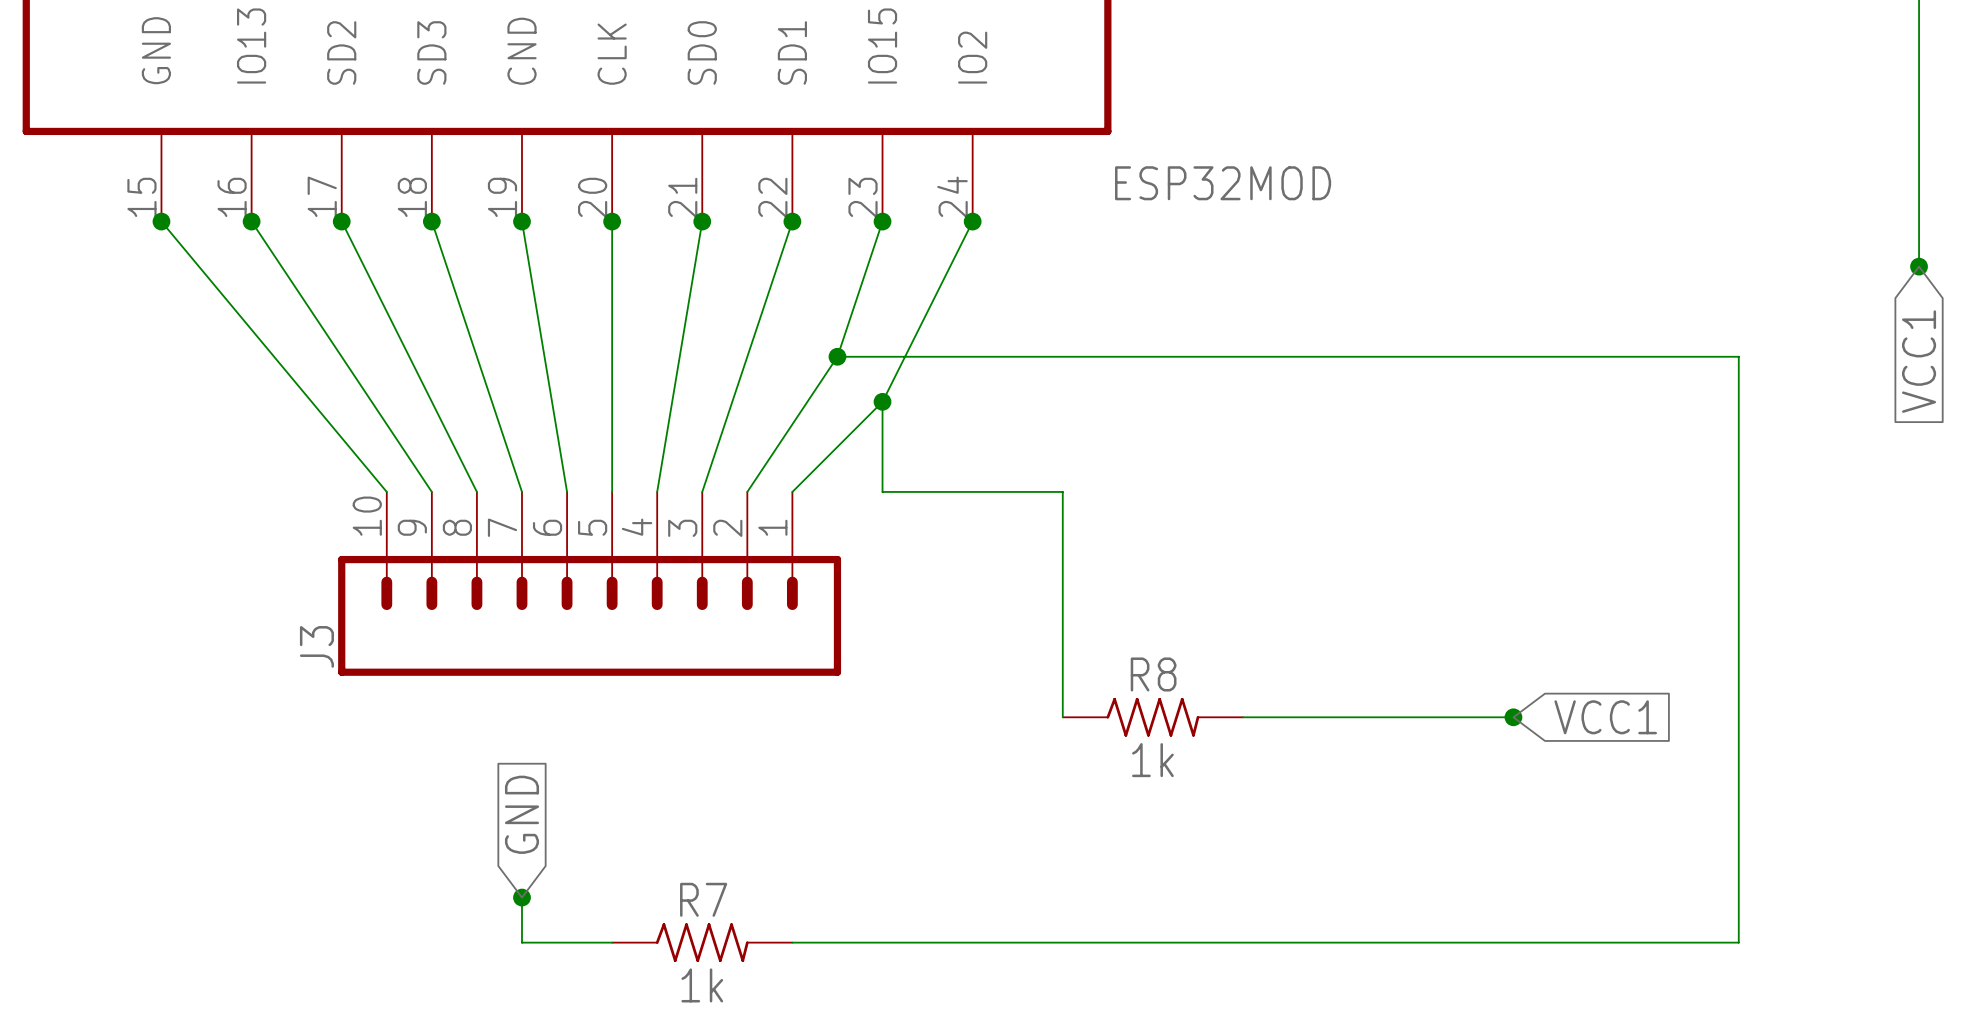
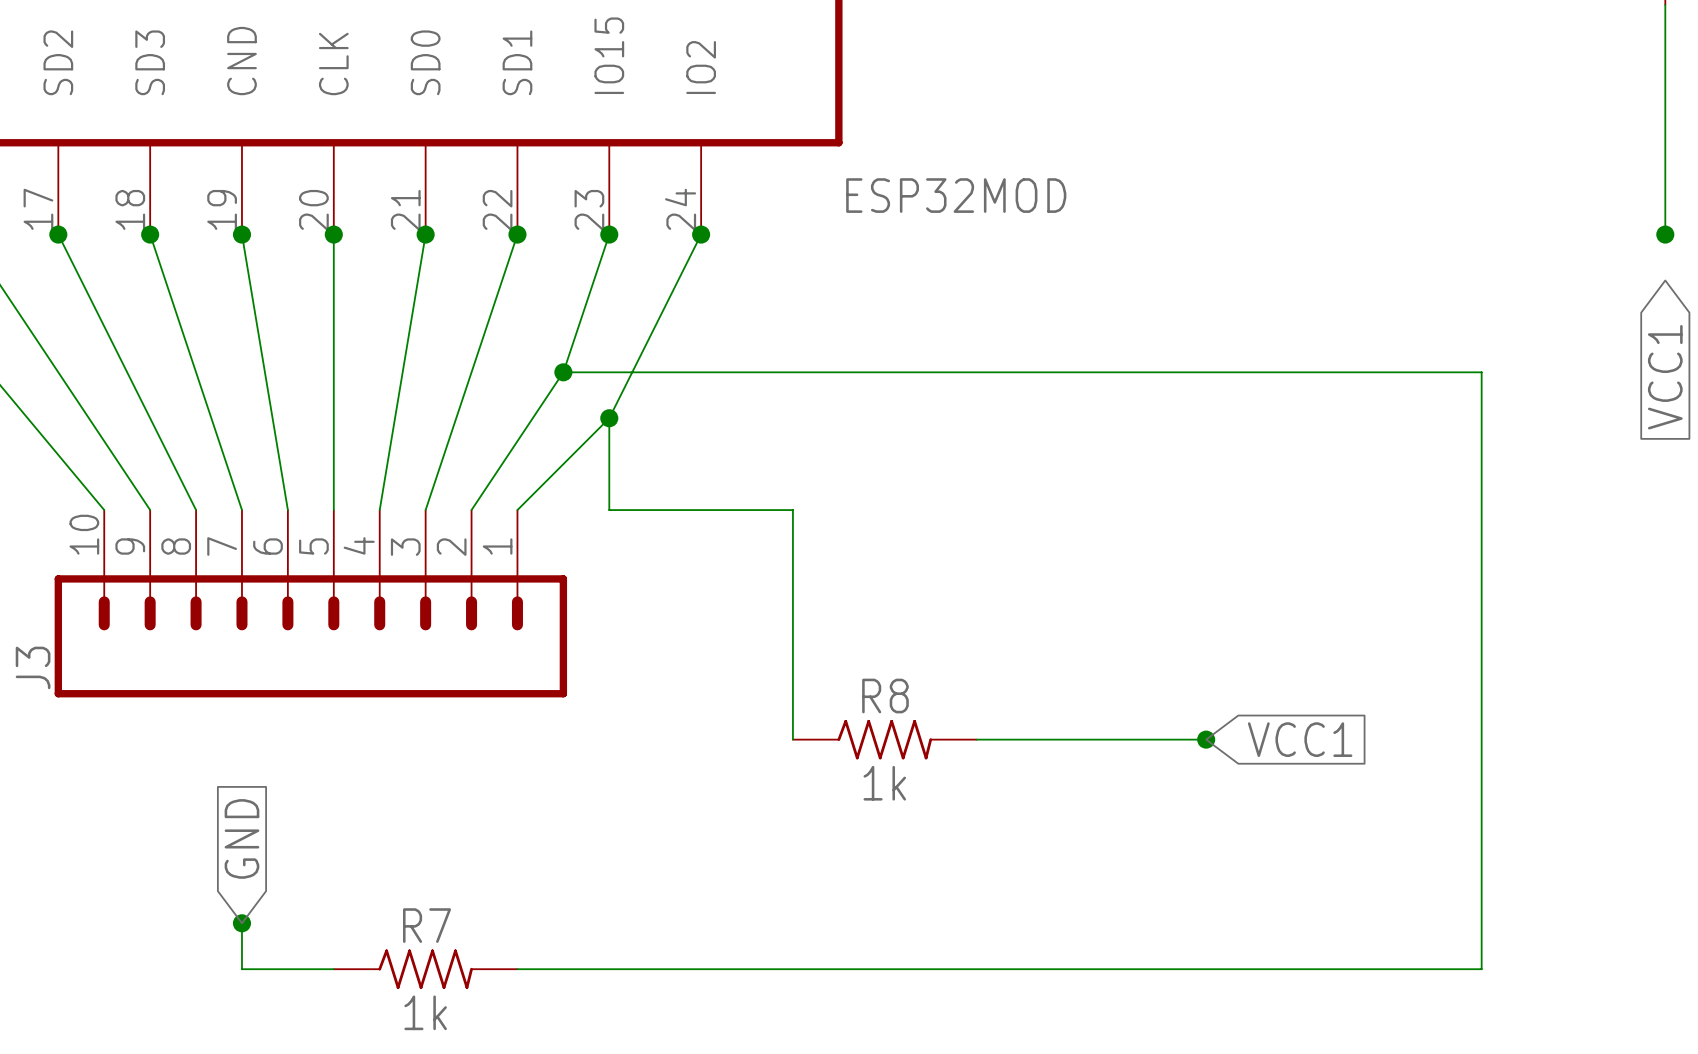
wire: (1919, 221) (1919, 266) -> none
junction position: (1919, 266) -> (1665, 234)
wire: (1468, 717) (1513, 717) -> none
junction position: (1513, 717) -> (1206, 739)
global label position: VCC1 (1605, 717) -> VCC1 (1300, 739)

